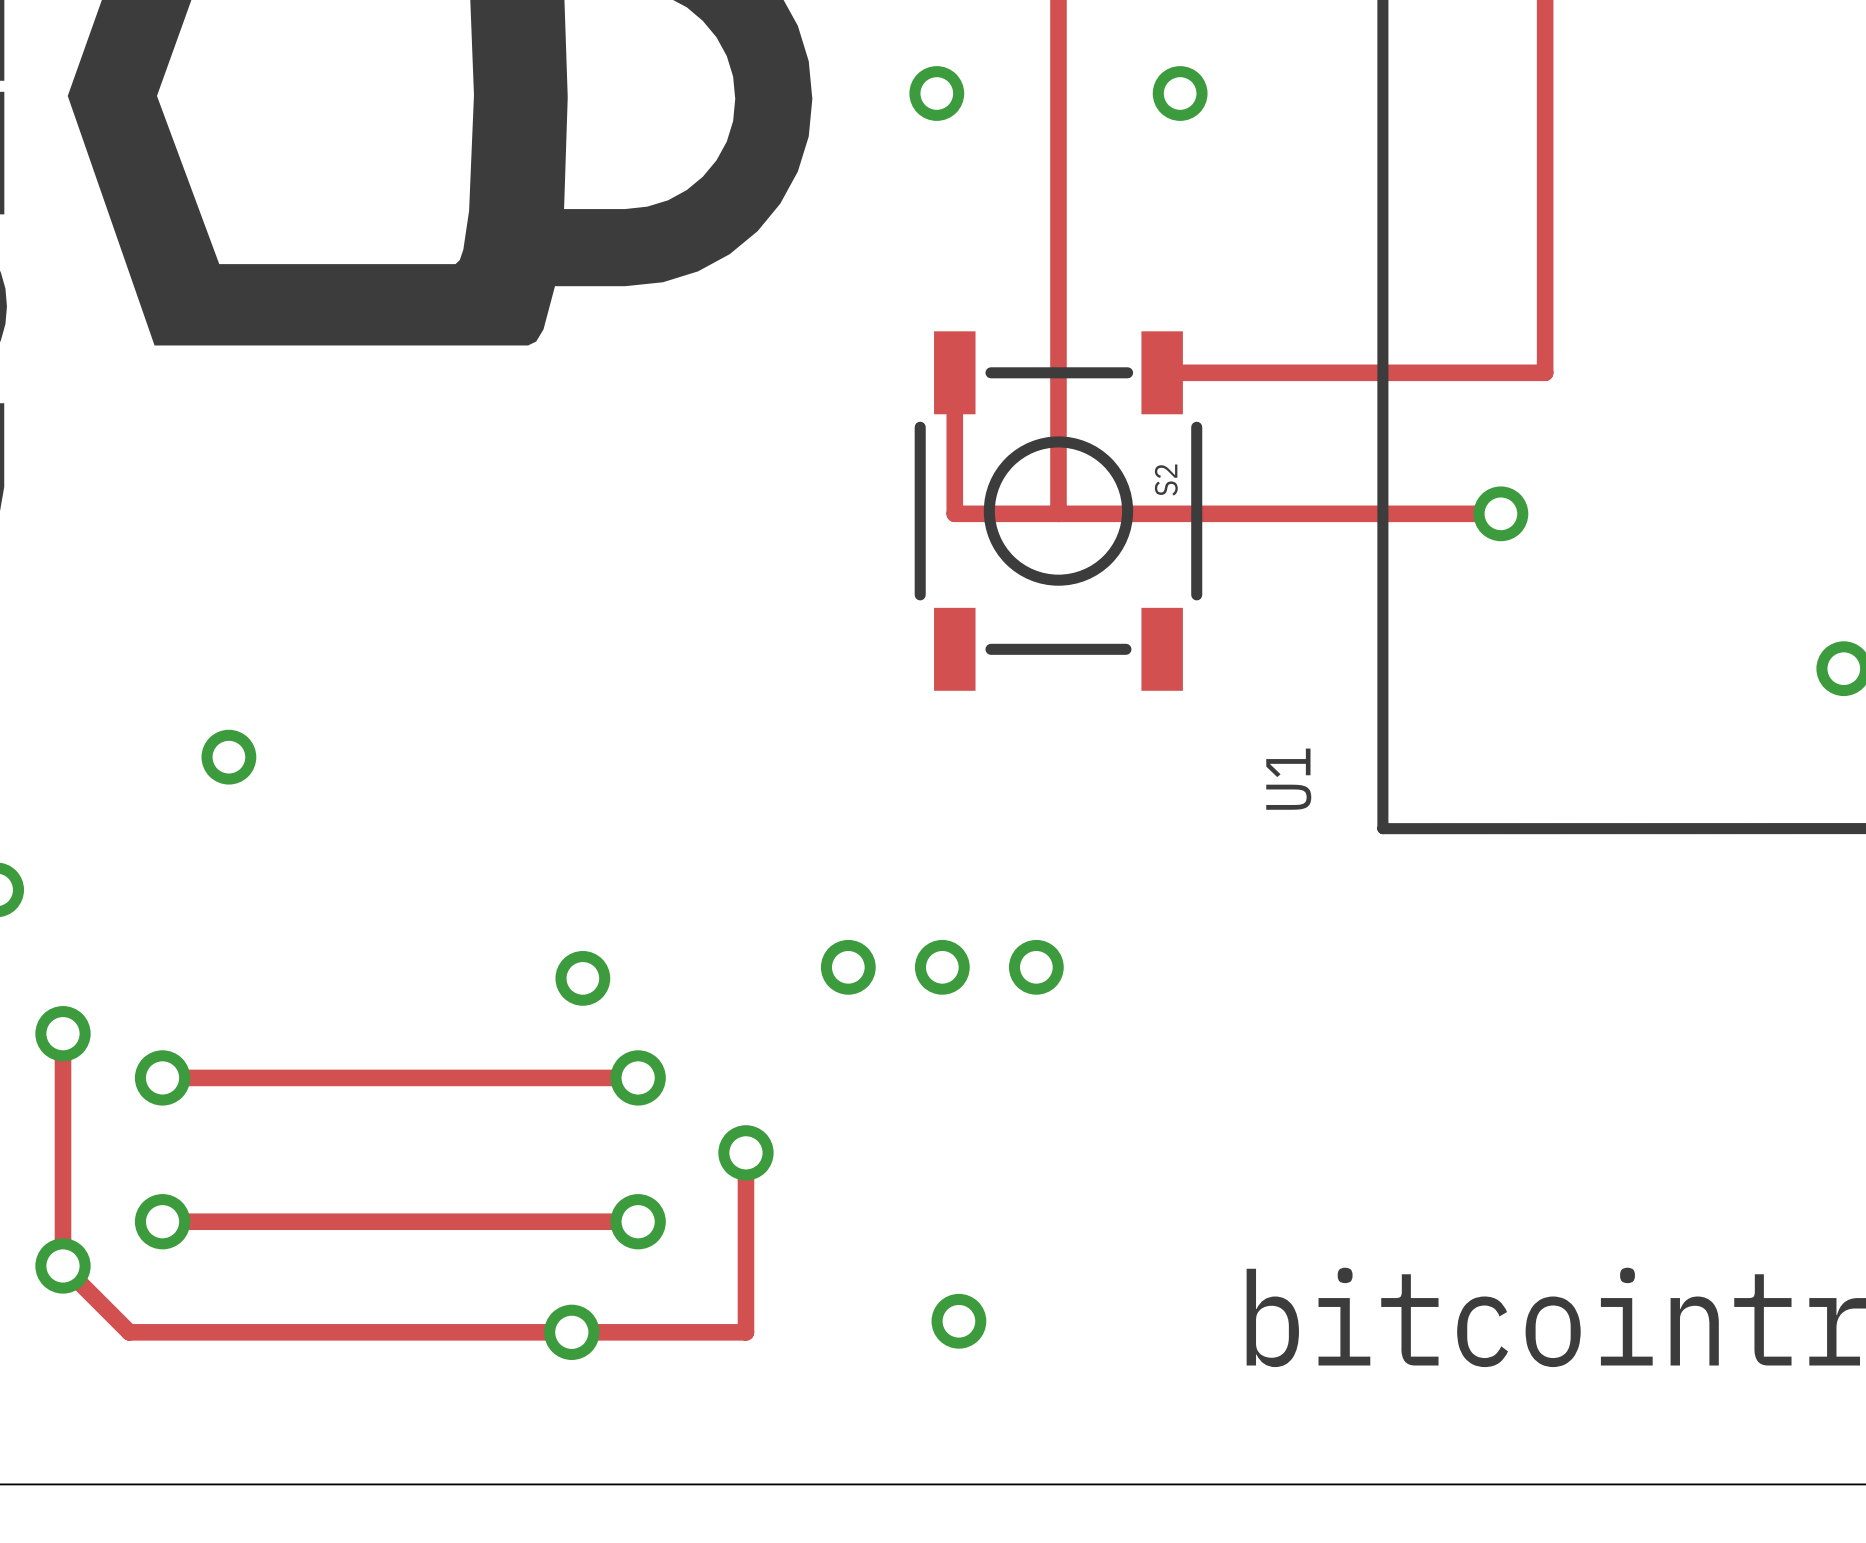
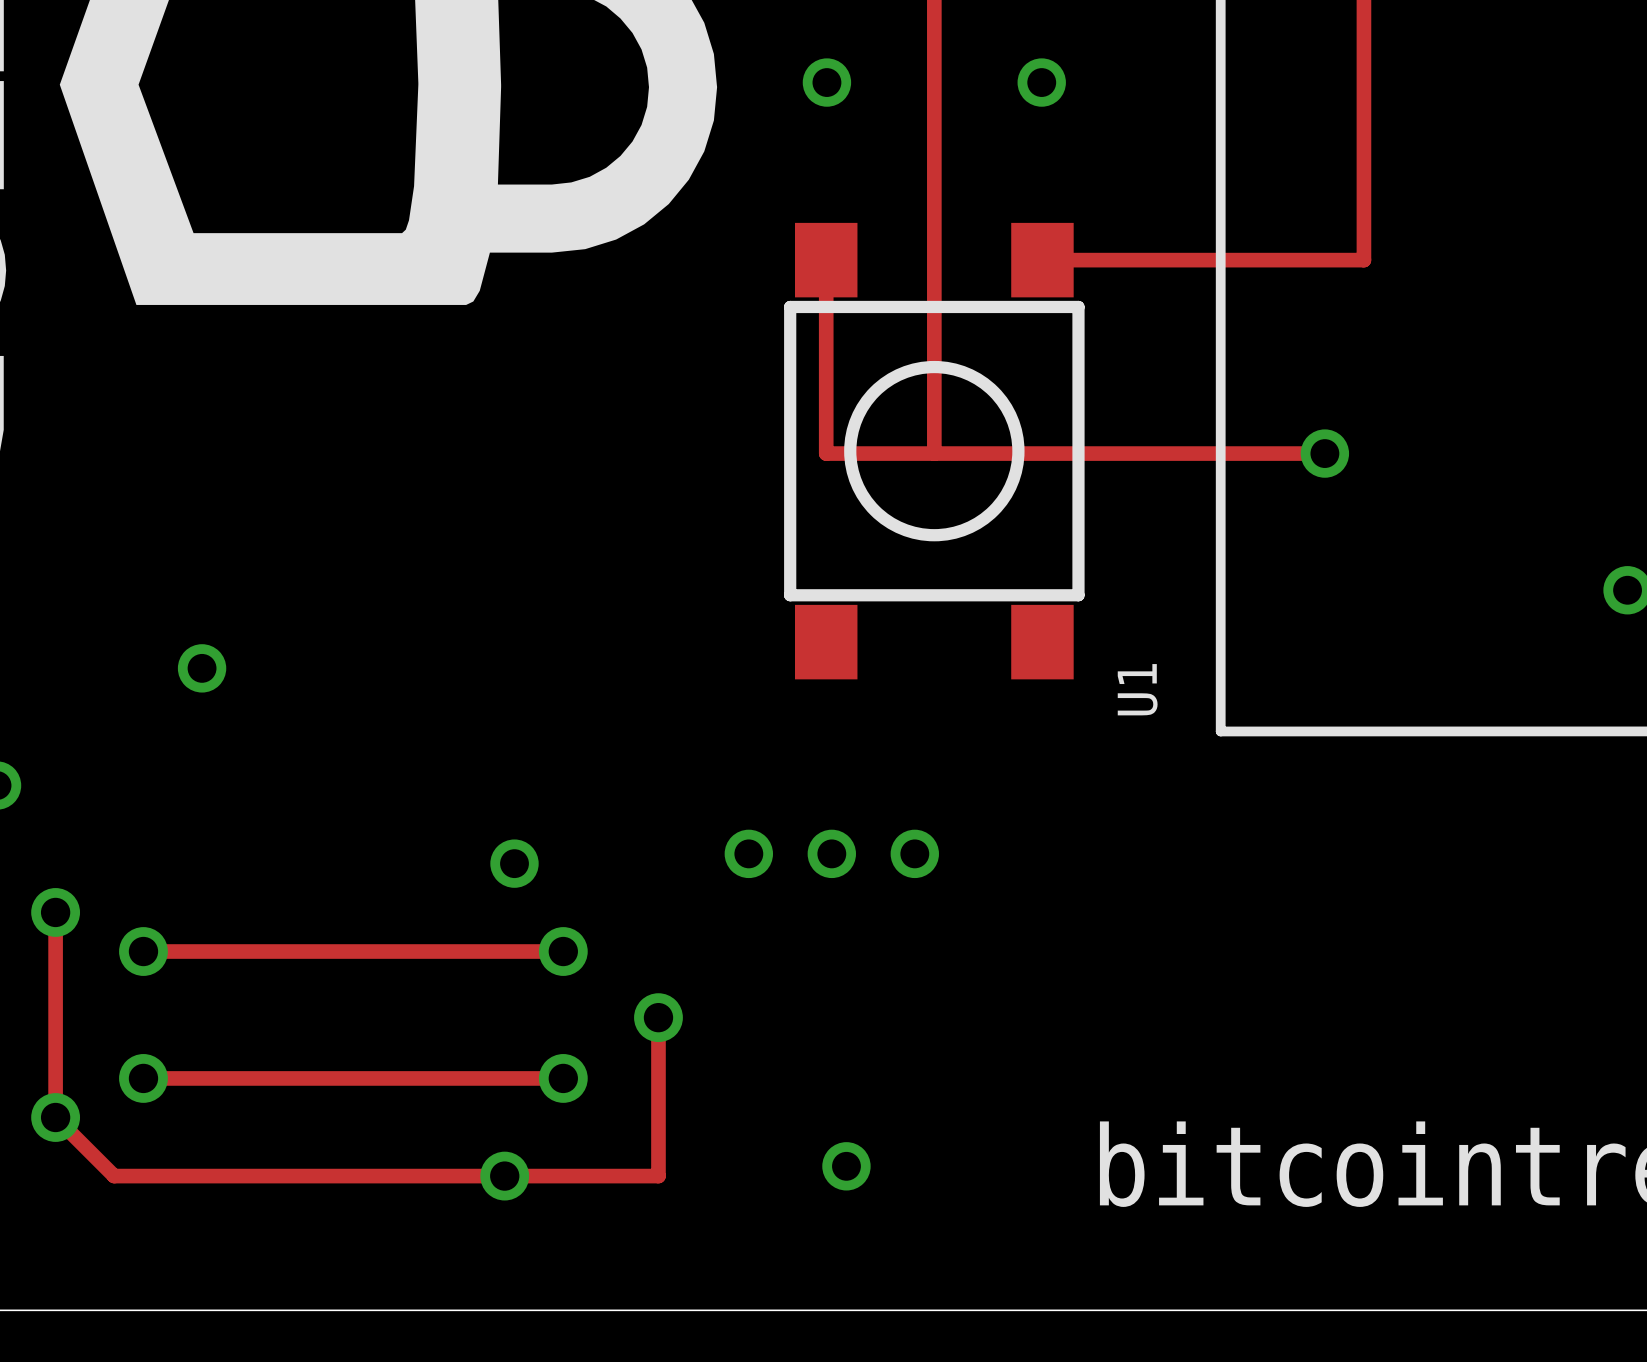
track: (1545, 294) (1545, 372) (1162, 372) -> (1363, 260) (1042, 260)
track: (954, 372) (954, 513) -> (826, 260) (826, 453) (842, 453)
S2: (1058, 511) -> none
part: none -> (934, 451)

